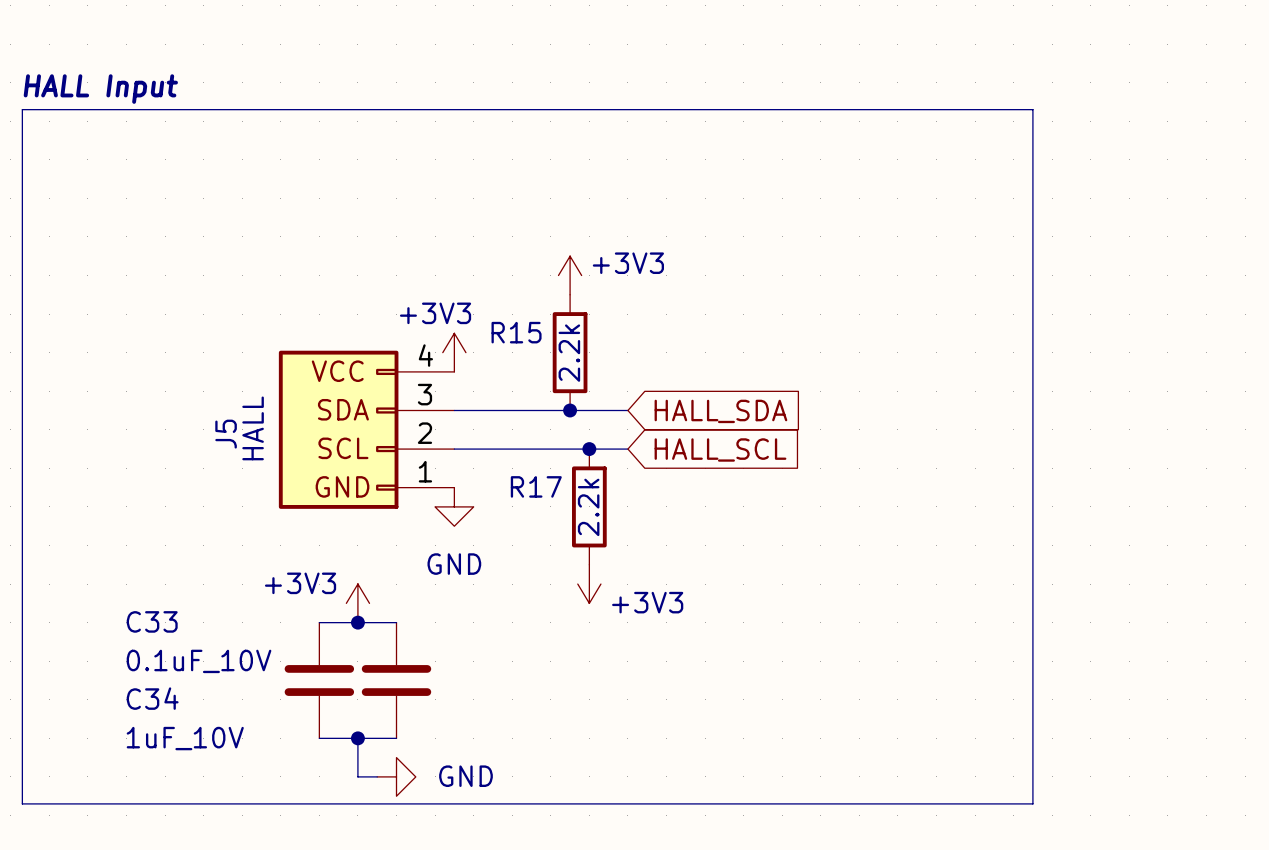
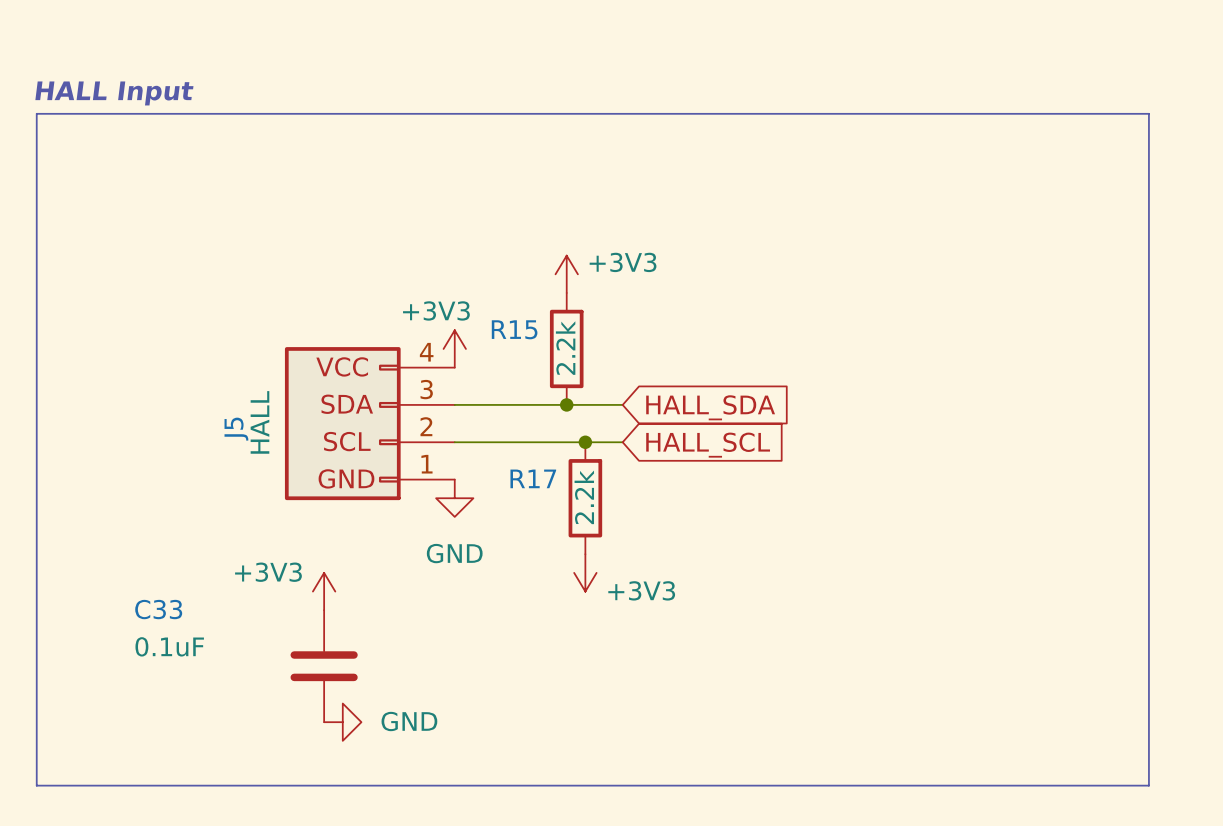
line: (1032, 109) (1032, 803) -> (1014, 113) (1148, 113) (1148, 785) (1014, 785)
power symbol position: +3V3 (357, 603) -> +3V3 (324, 591)
wire: (319, 622) (396, 622) -> none
junction: (357, 622) -> none
C33 value: 0.1uF_10V (199, 661) -> 0.1uF (169, 646)
C34: 1uF_10V (396, 680) -> none
wire: (319, 738) (396, 738) -> none
wire: (357, 738) (357, 776) (377, 776) -> none
junction: (357, 738) -> none
power symbol position: GND (396, 776) -> GND (342, 722)

